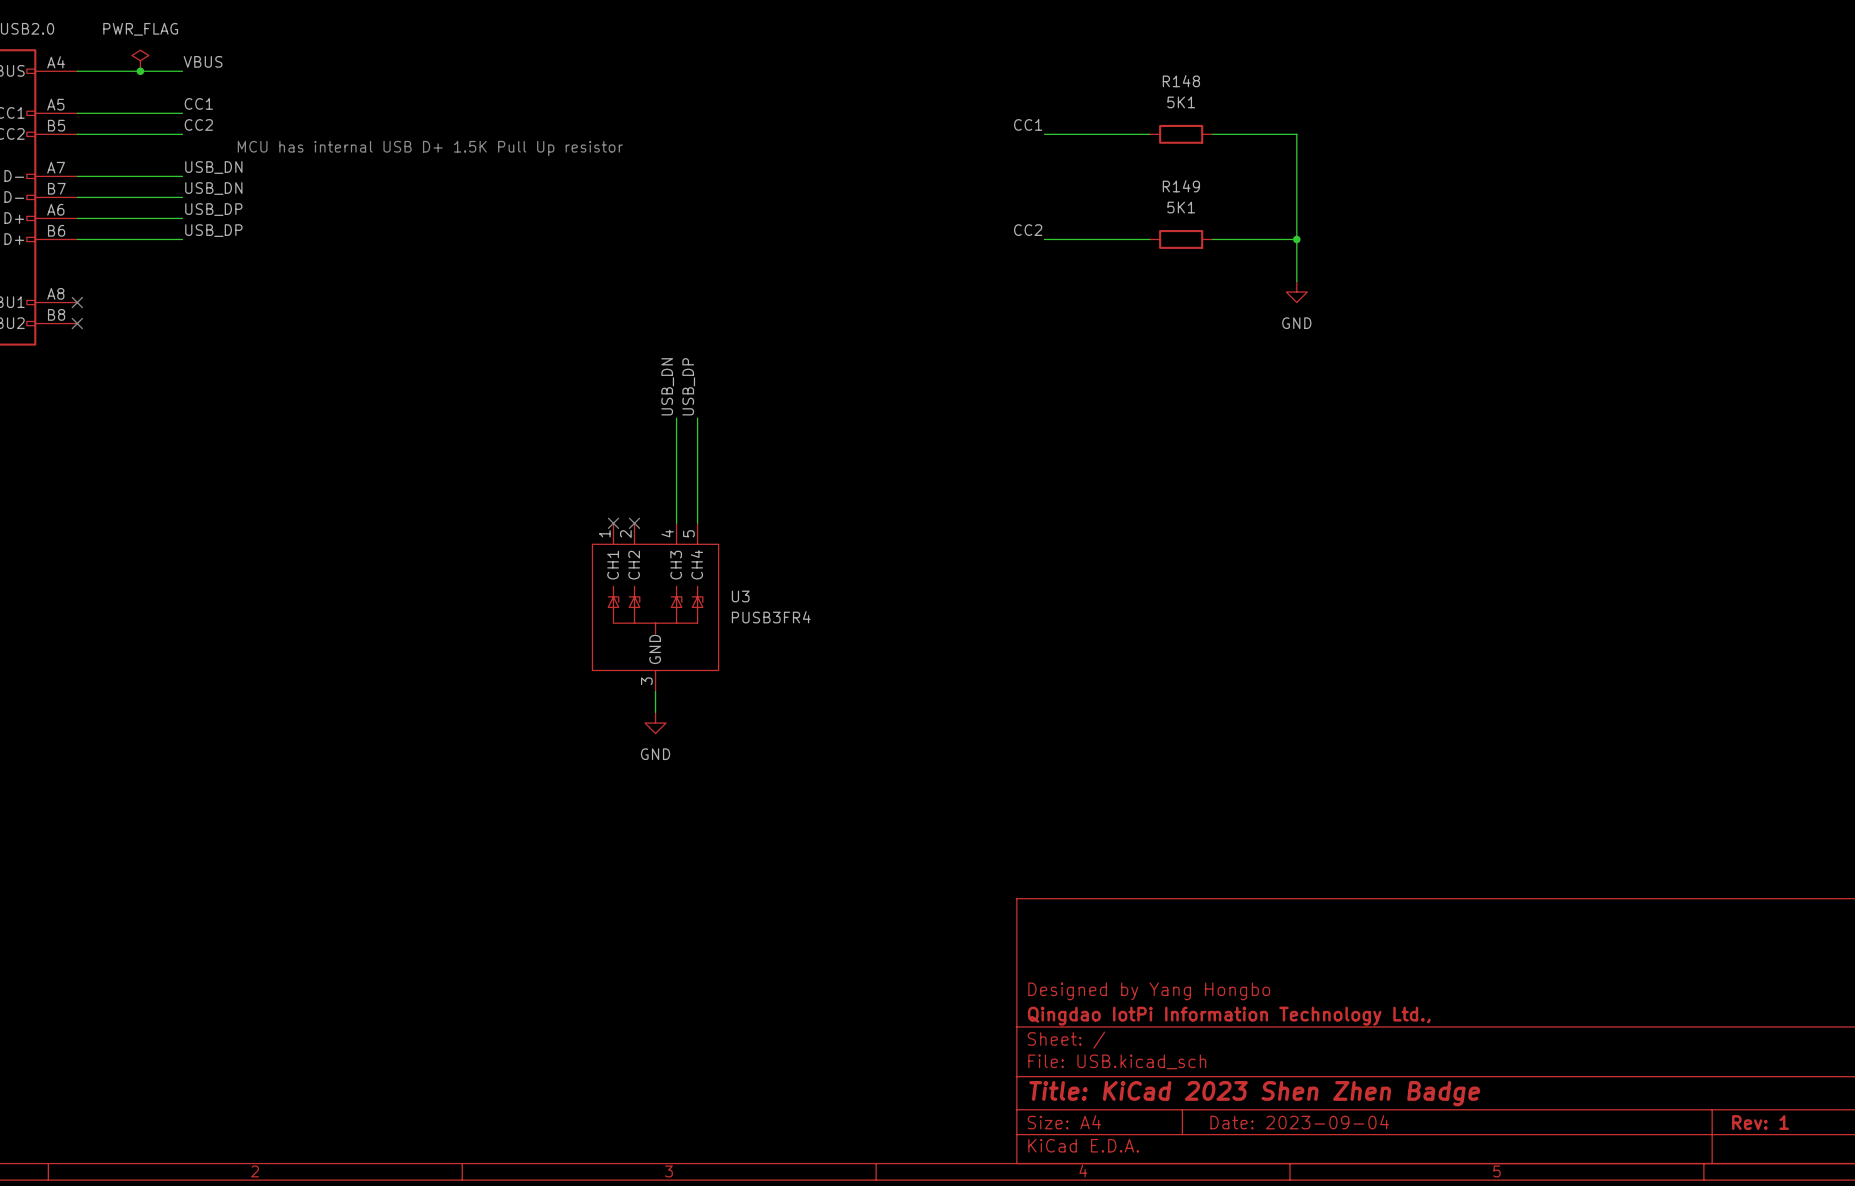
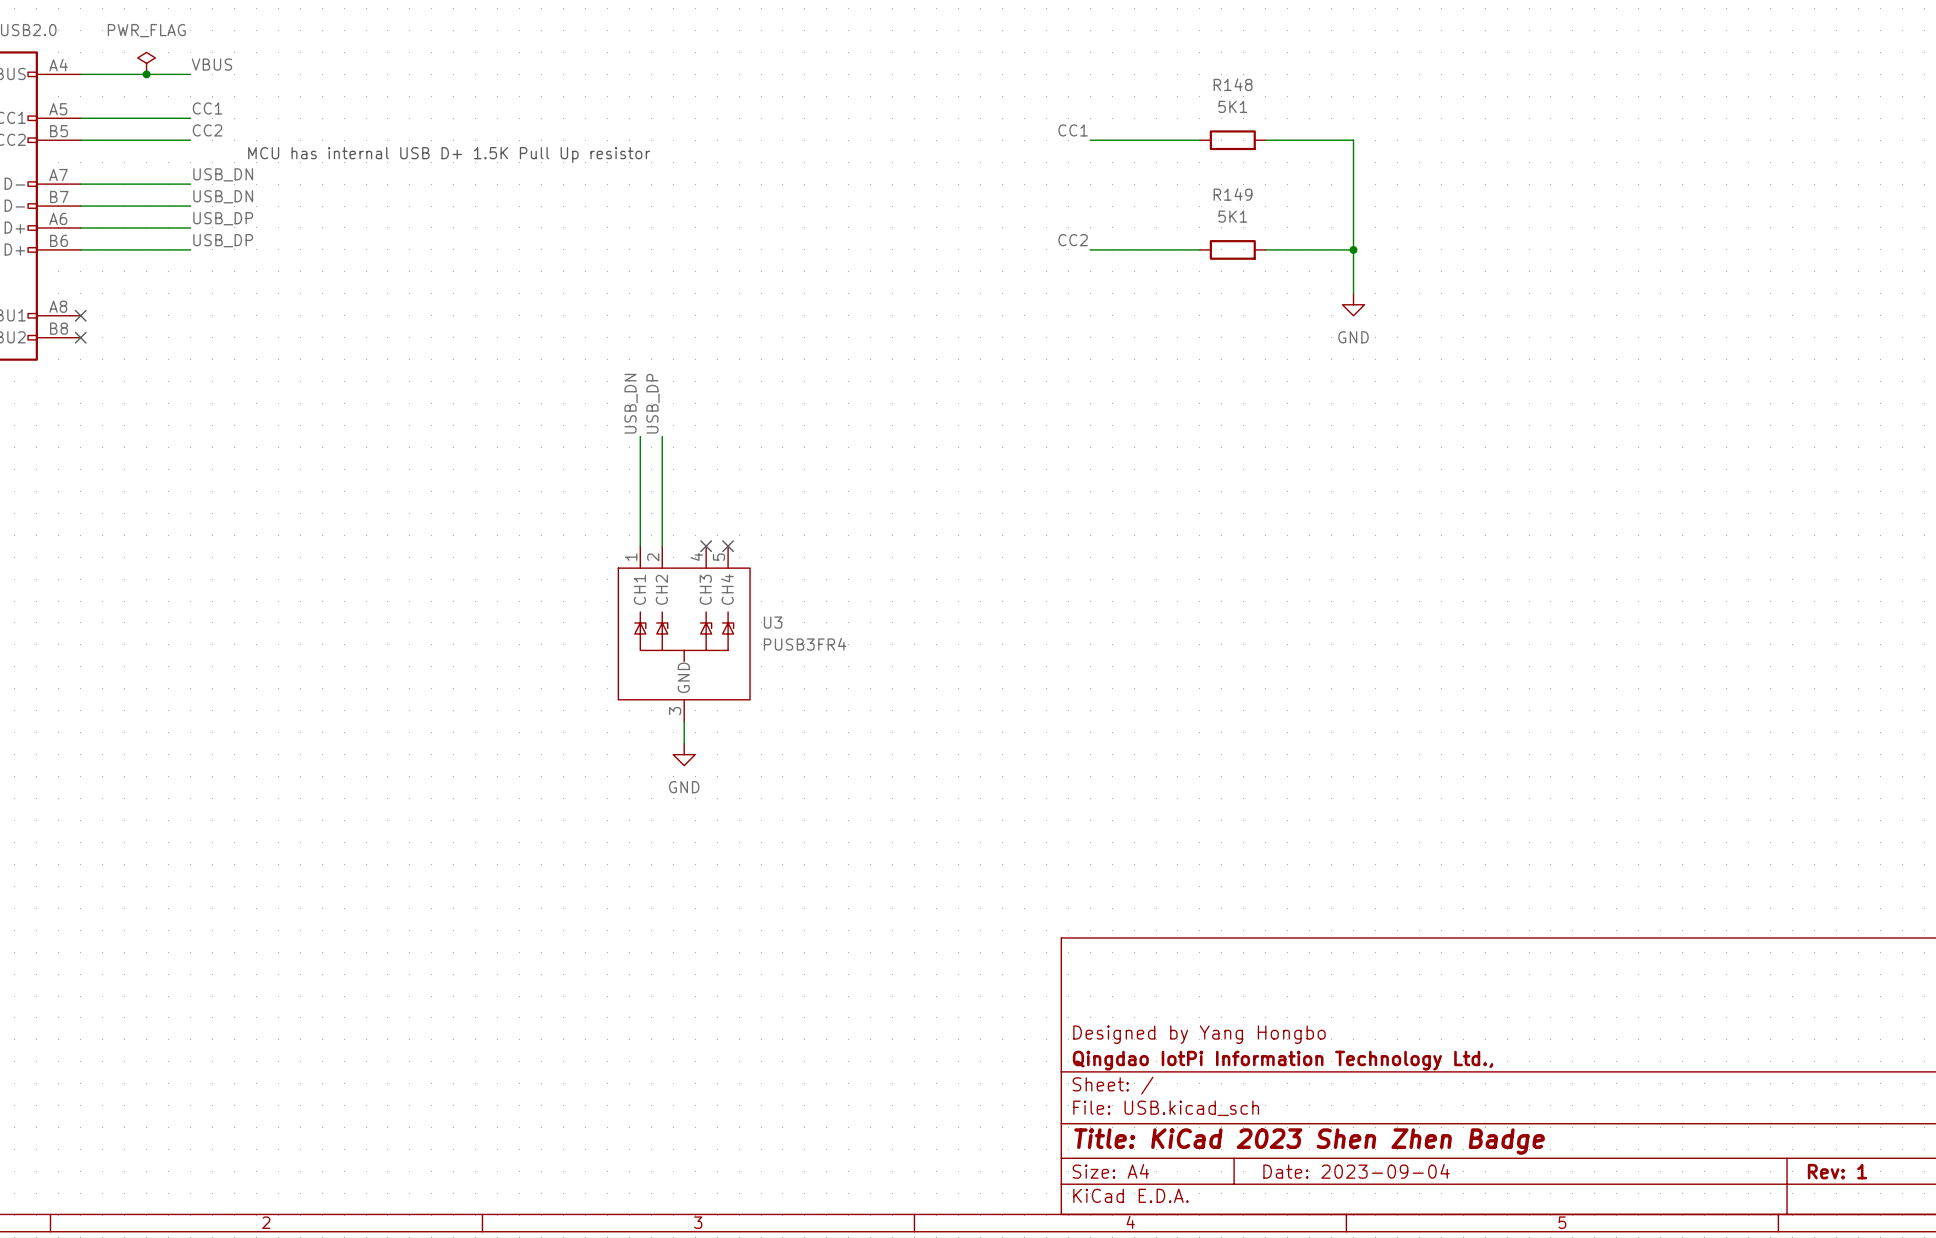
label position: USB_DN (667, 386) -> USB_DN (631, 403)
label position: USB_DP (688, 386) -> USB_DP (652, 403)
wire: (676, 418) (676, 523) -> (662, 436) (662, 546)
wire: (697, 418) (697, 523) -> (640, 436) (640, 546)
no-connect mark: (613, 523) -> none
no-connect mark: (634, 523) -> none
no-connect mark: none -> (706, 546)
no-connect mark: none -> (728, 546)

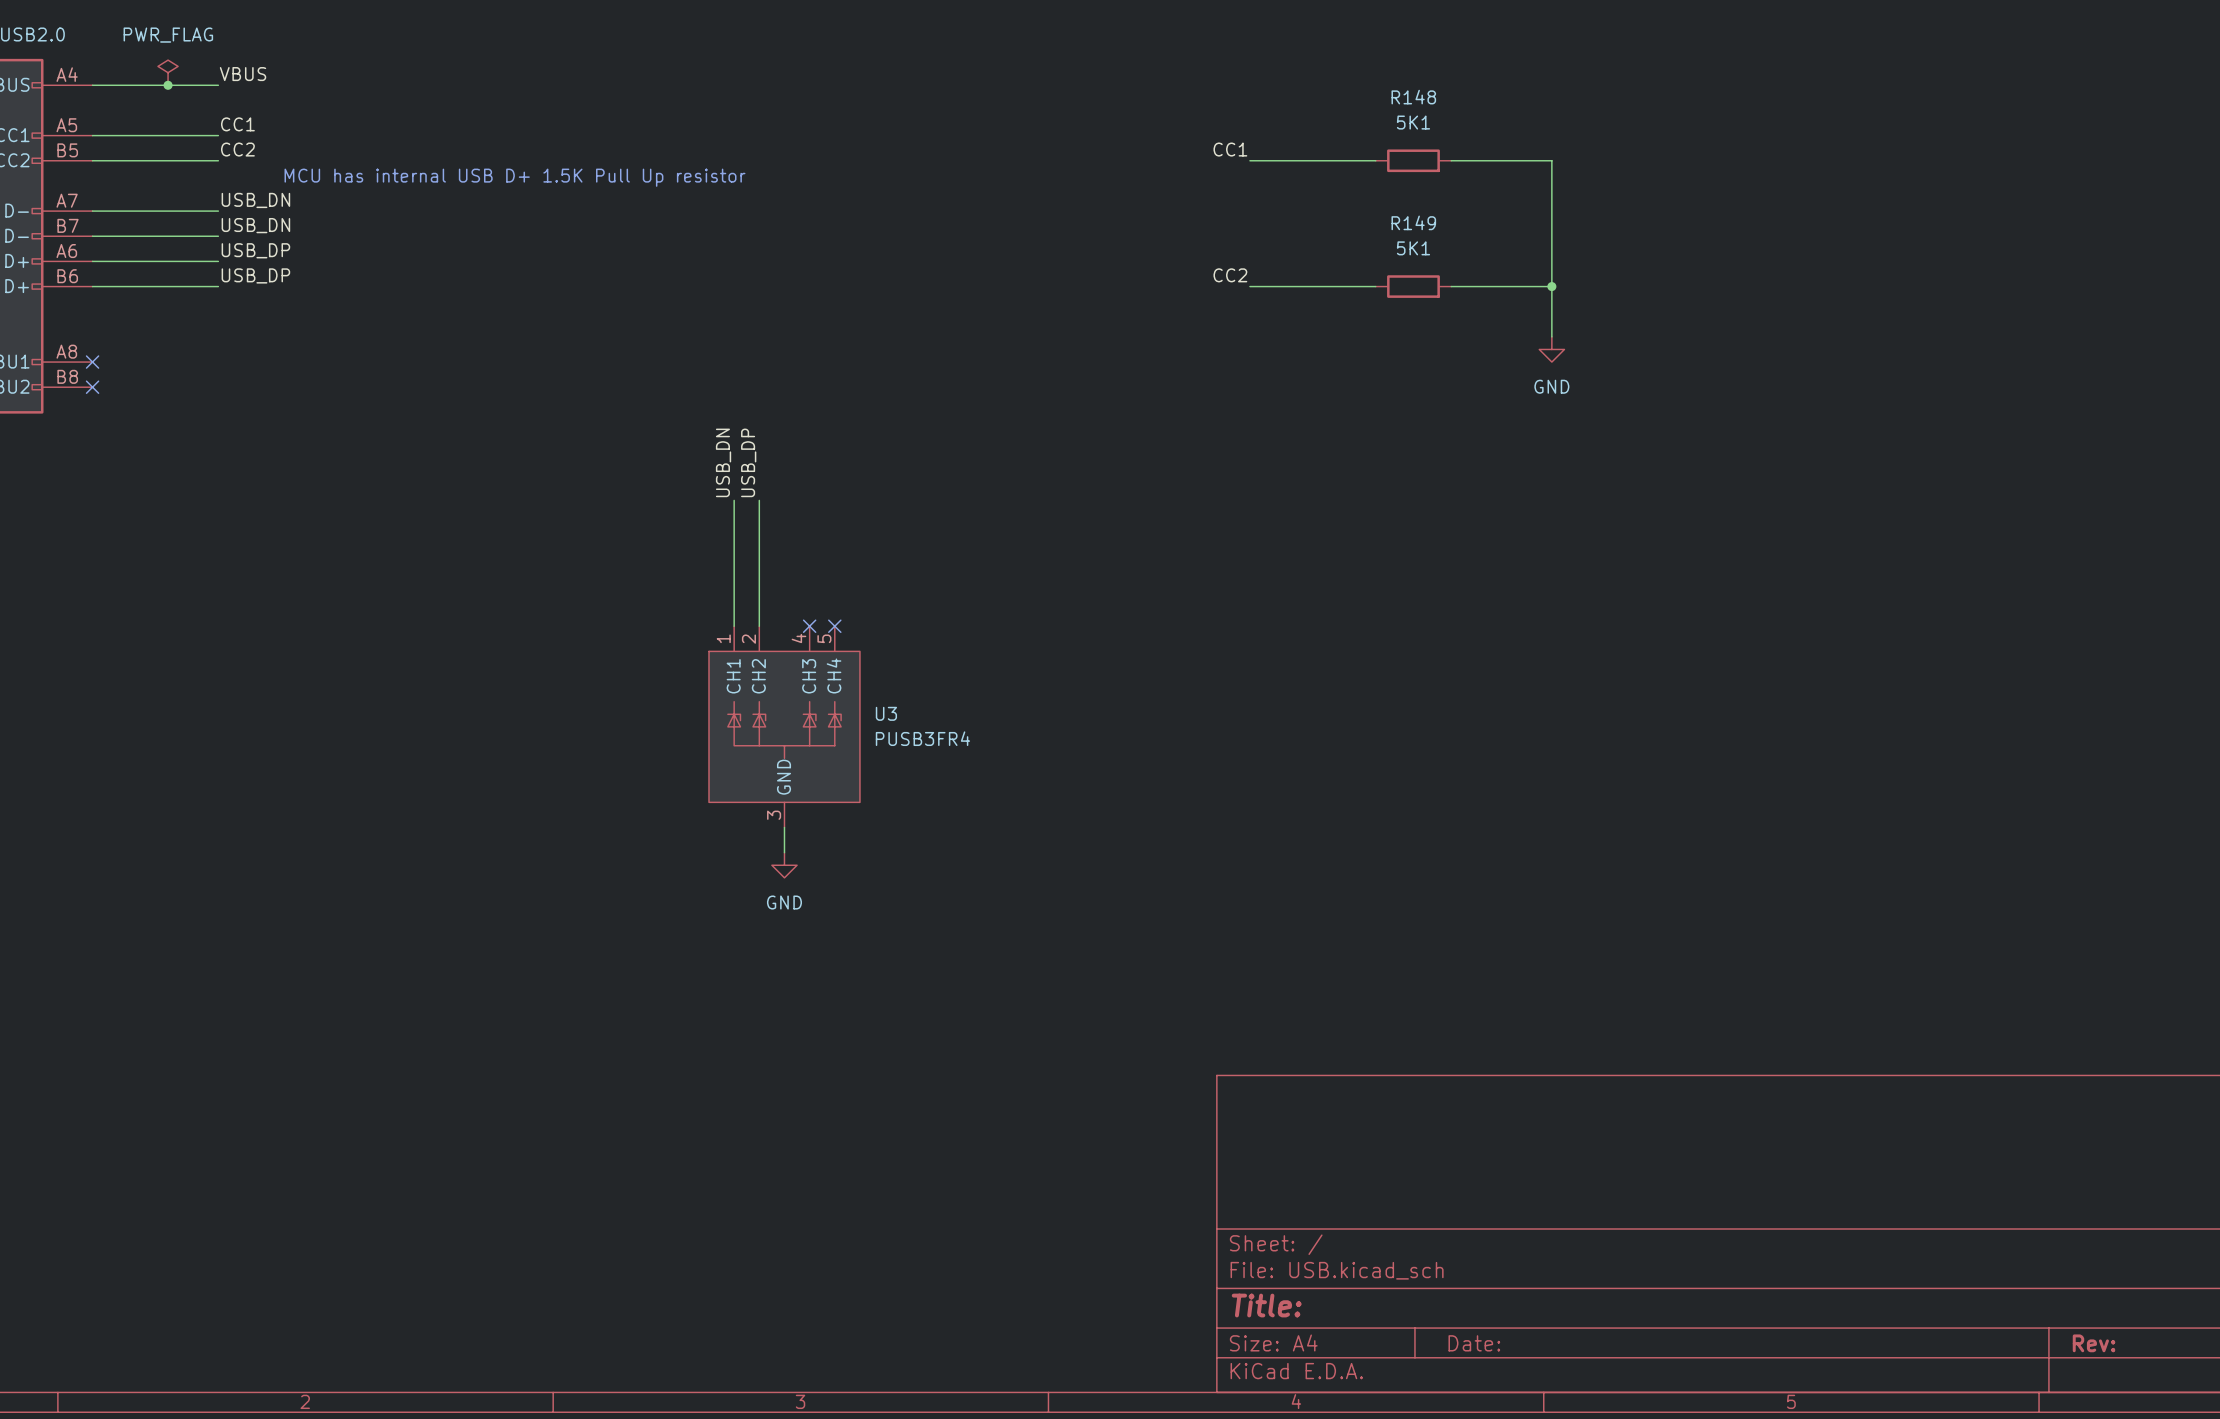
title block: Designed by Yang Hongbo (1199, 1034) -> none
title block: Qingdao IotPi Information Technology Ltd., (1283, 1060) -> none
title block: Title: KiCad 2023 Shen Zhen Badge (1309, 1141) -> Title: (1266, 1305)
title block: Date: 2023-09-04 (1356, 1171) -> Date: (1474, 1343)
title block: Rev: 1 (1837, 1171) -> Rev: (2094, 1343)

